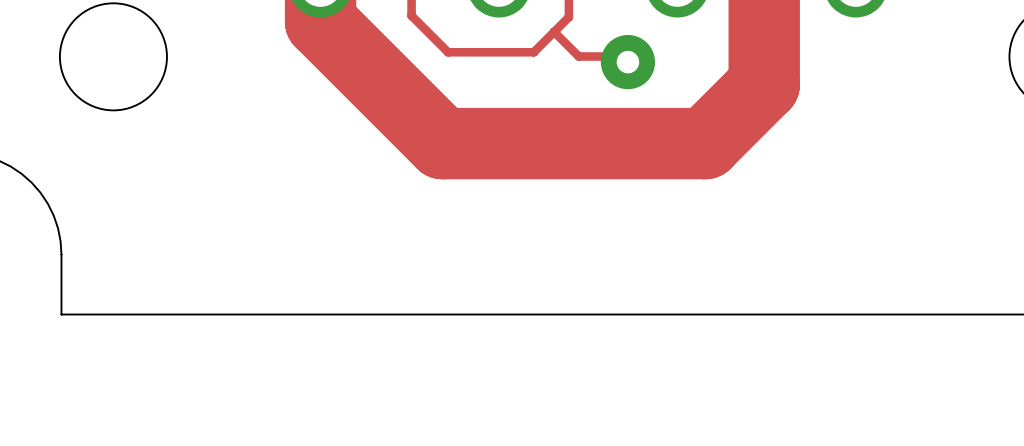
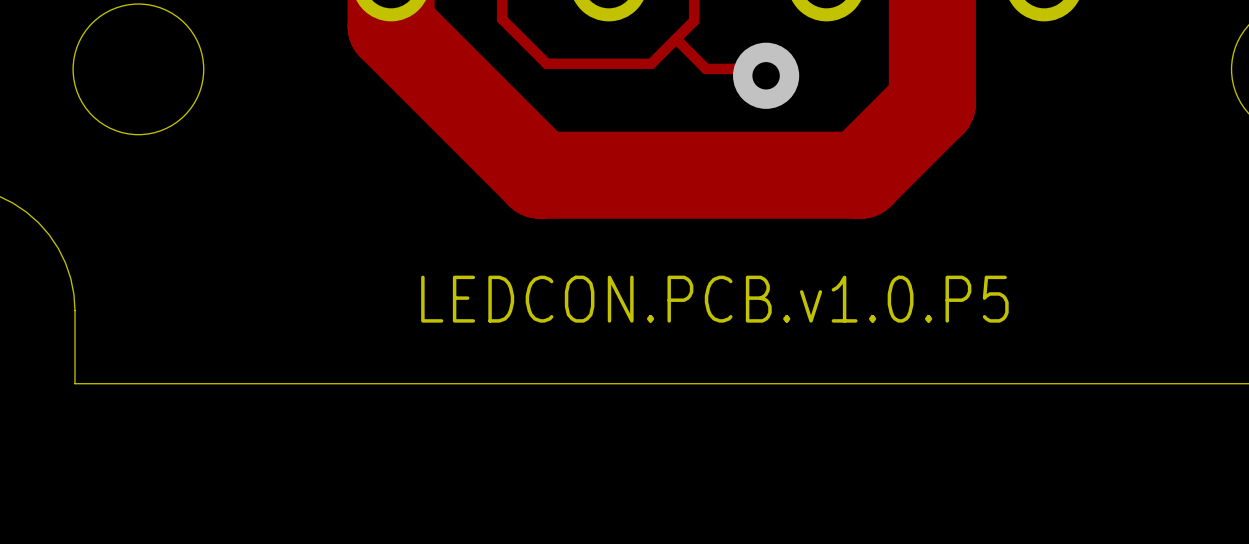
text: none -> LEDCON.PCB.v1.0.P5 (714, 299)

